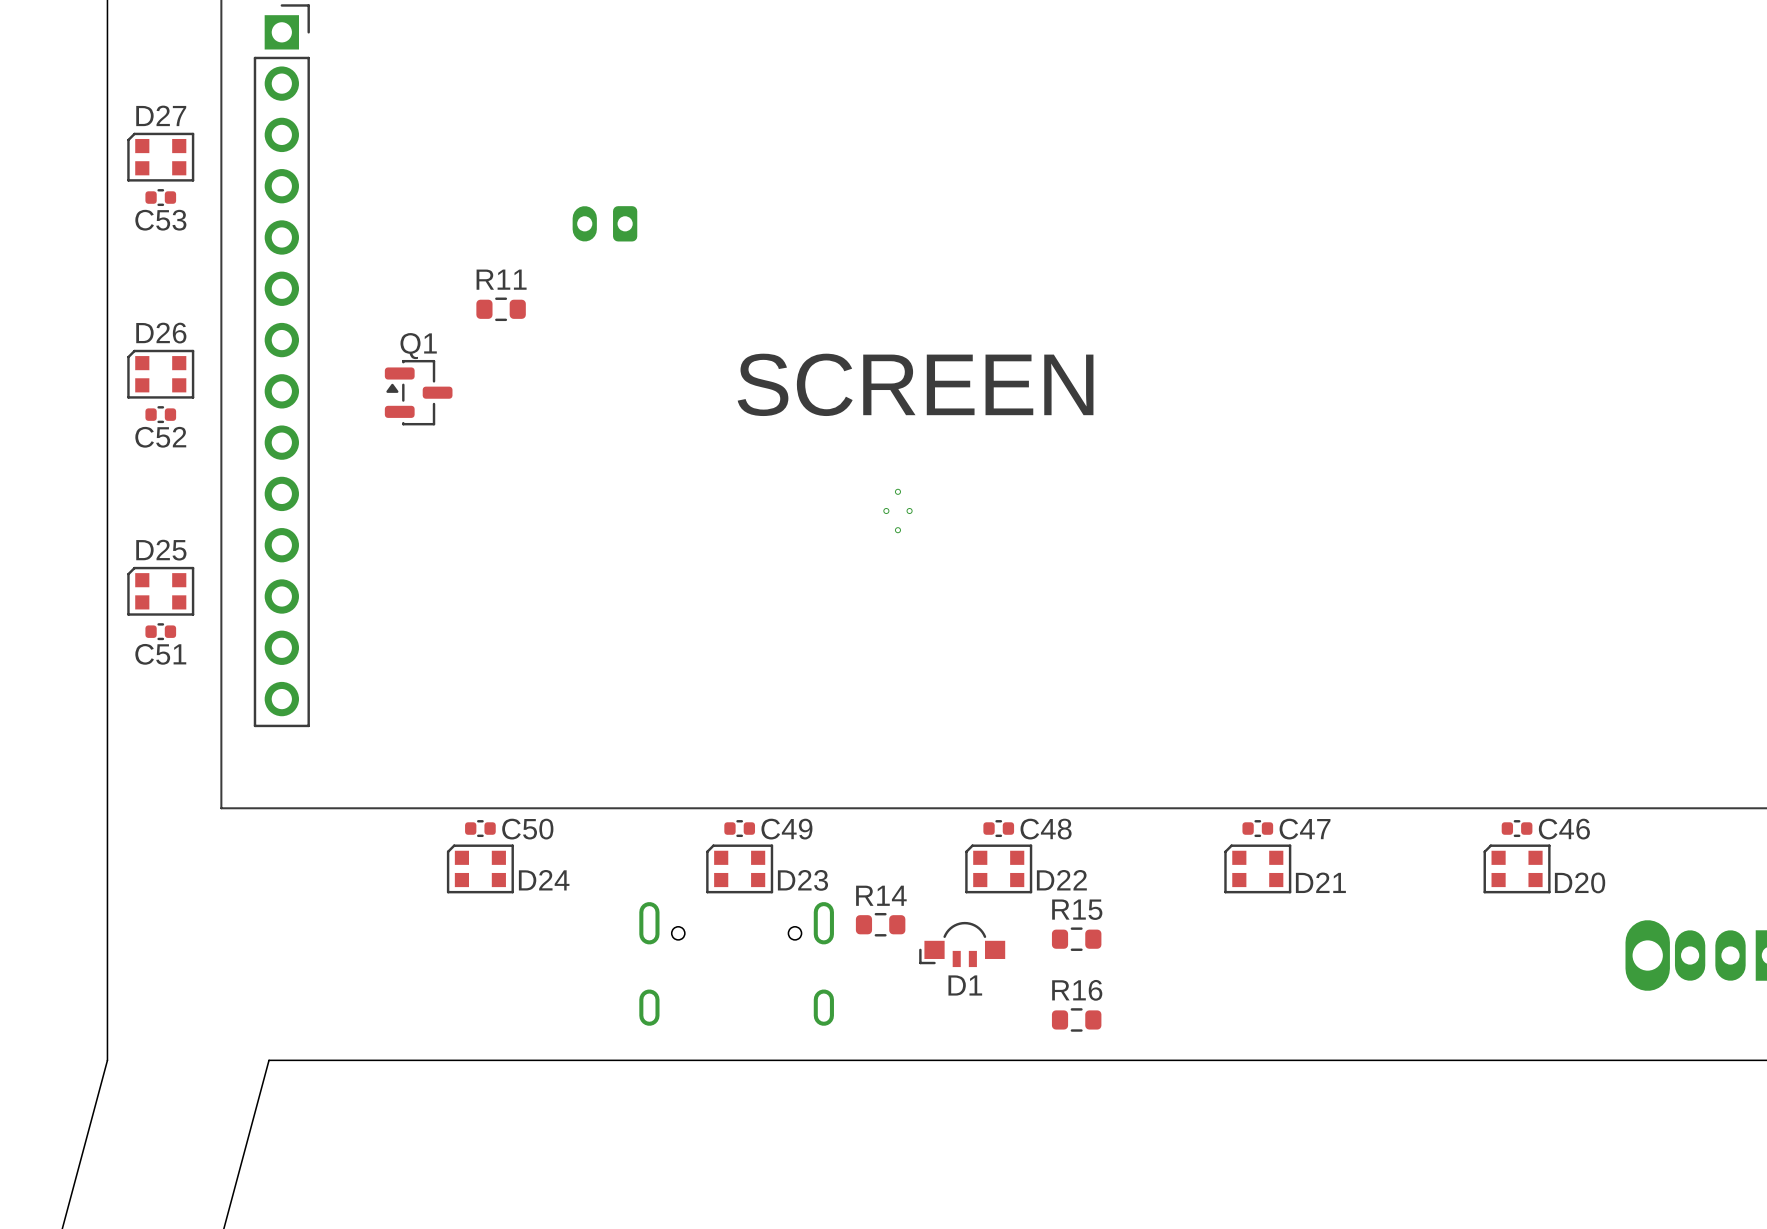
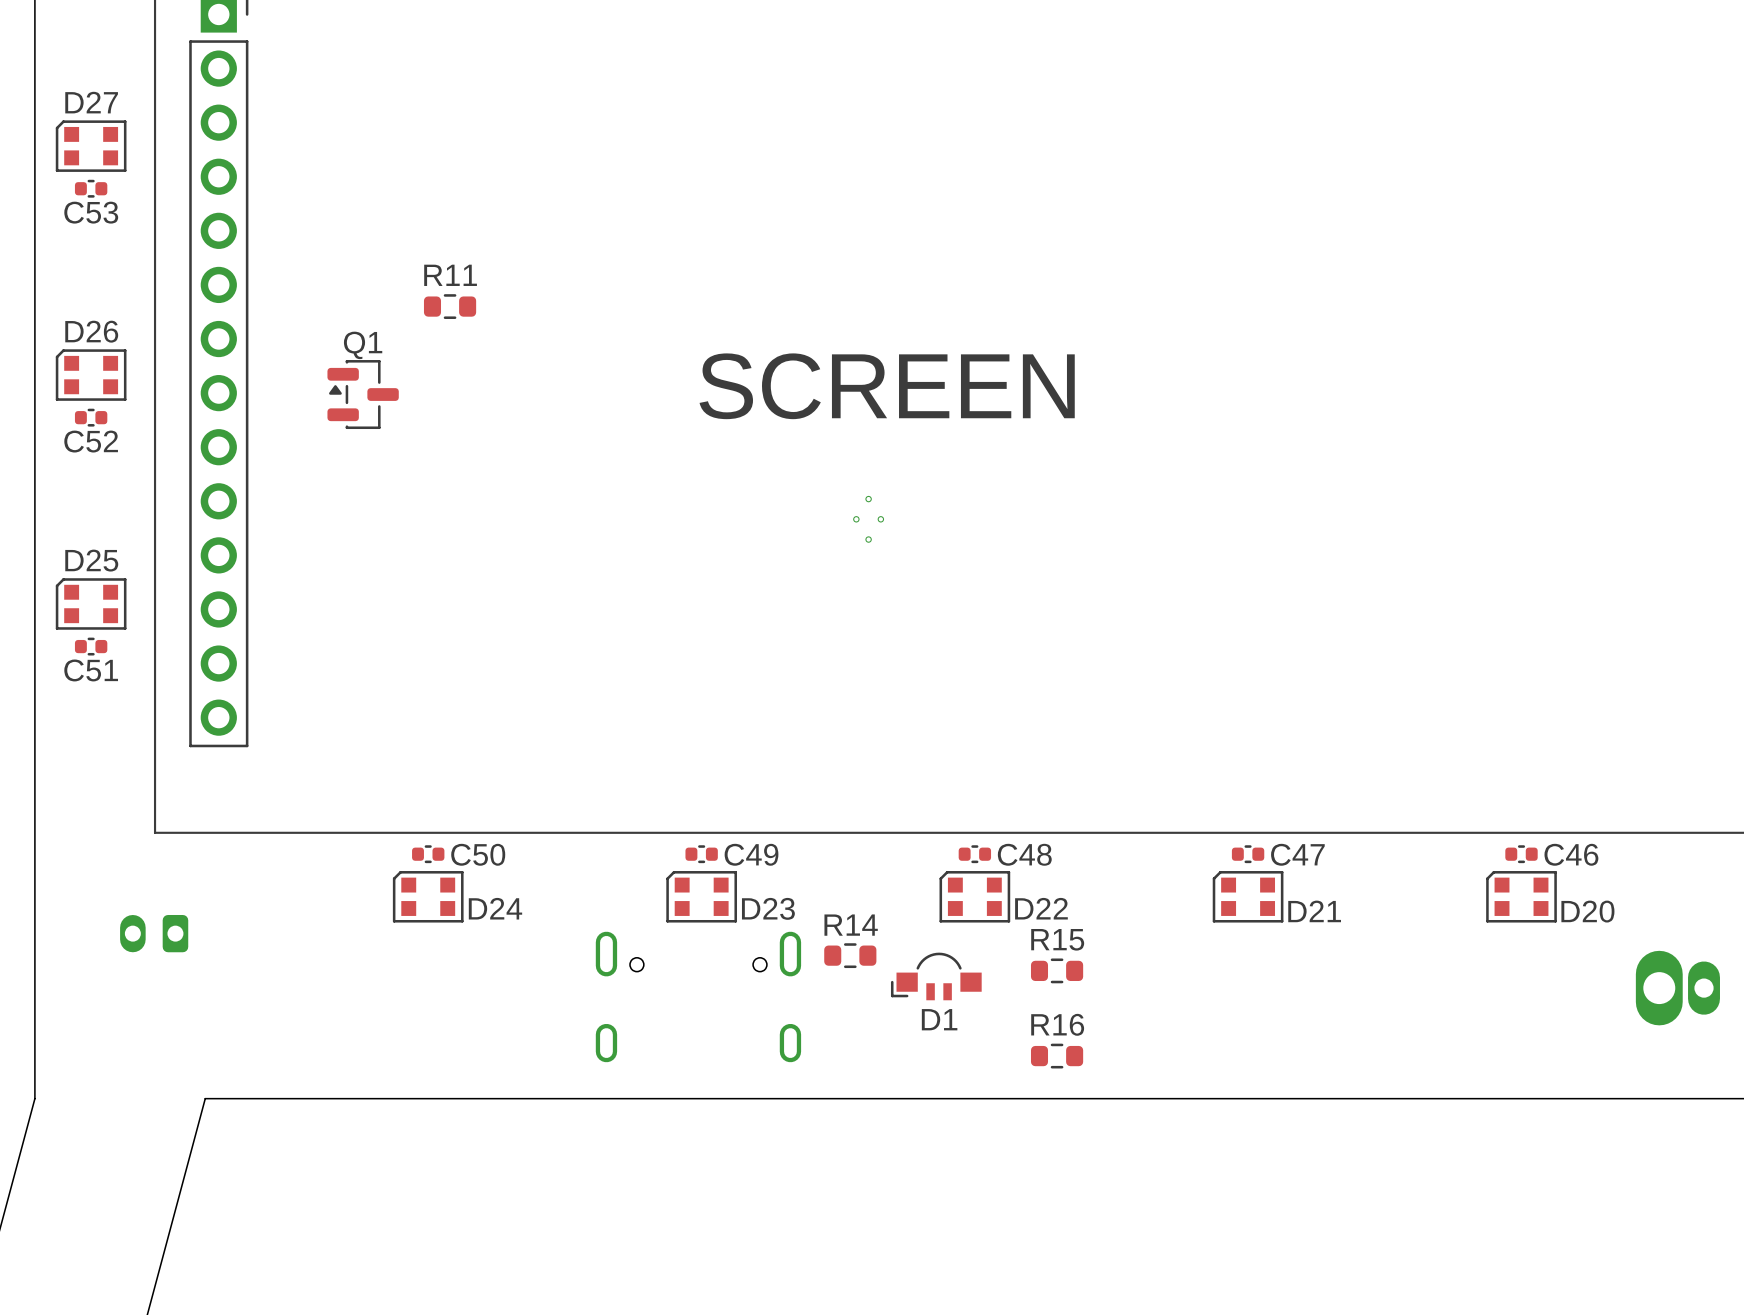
part: (604, 223) -> none
part: none -> (154, 933)

